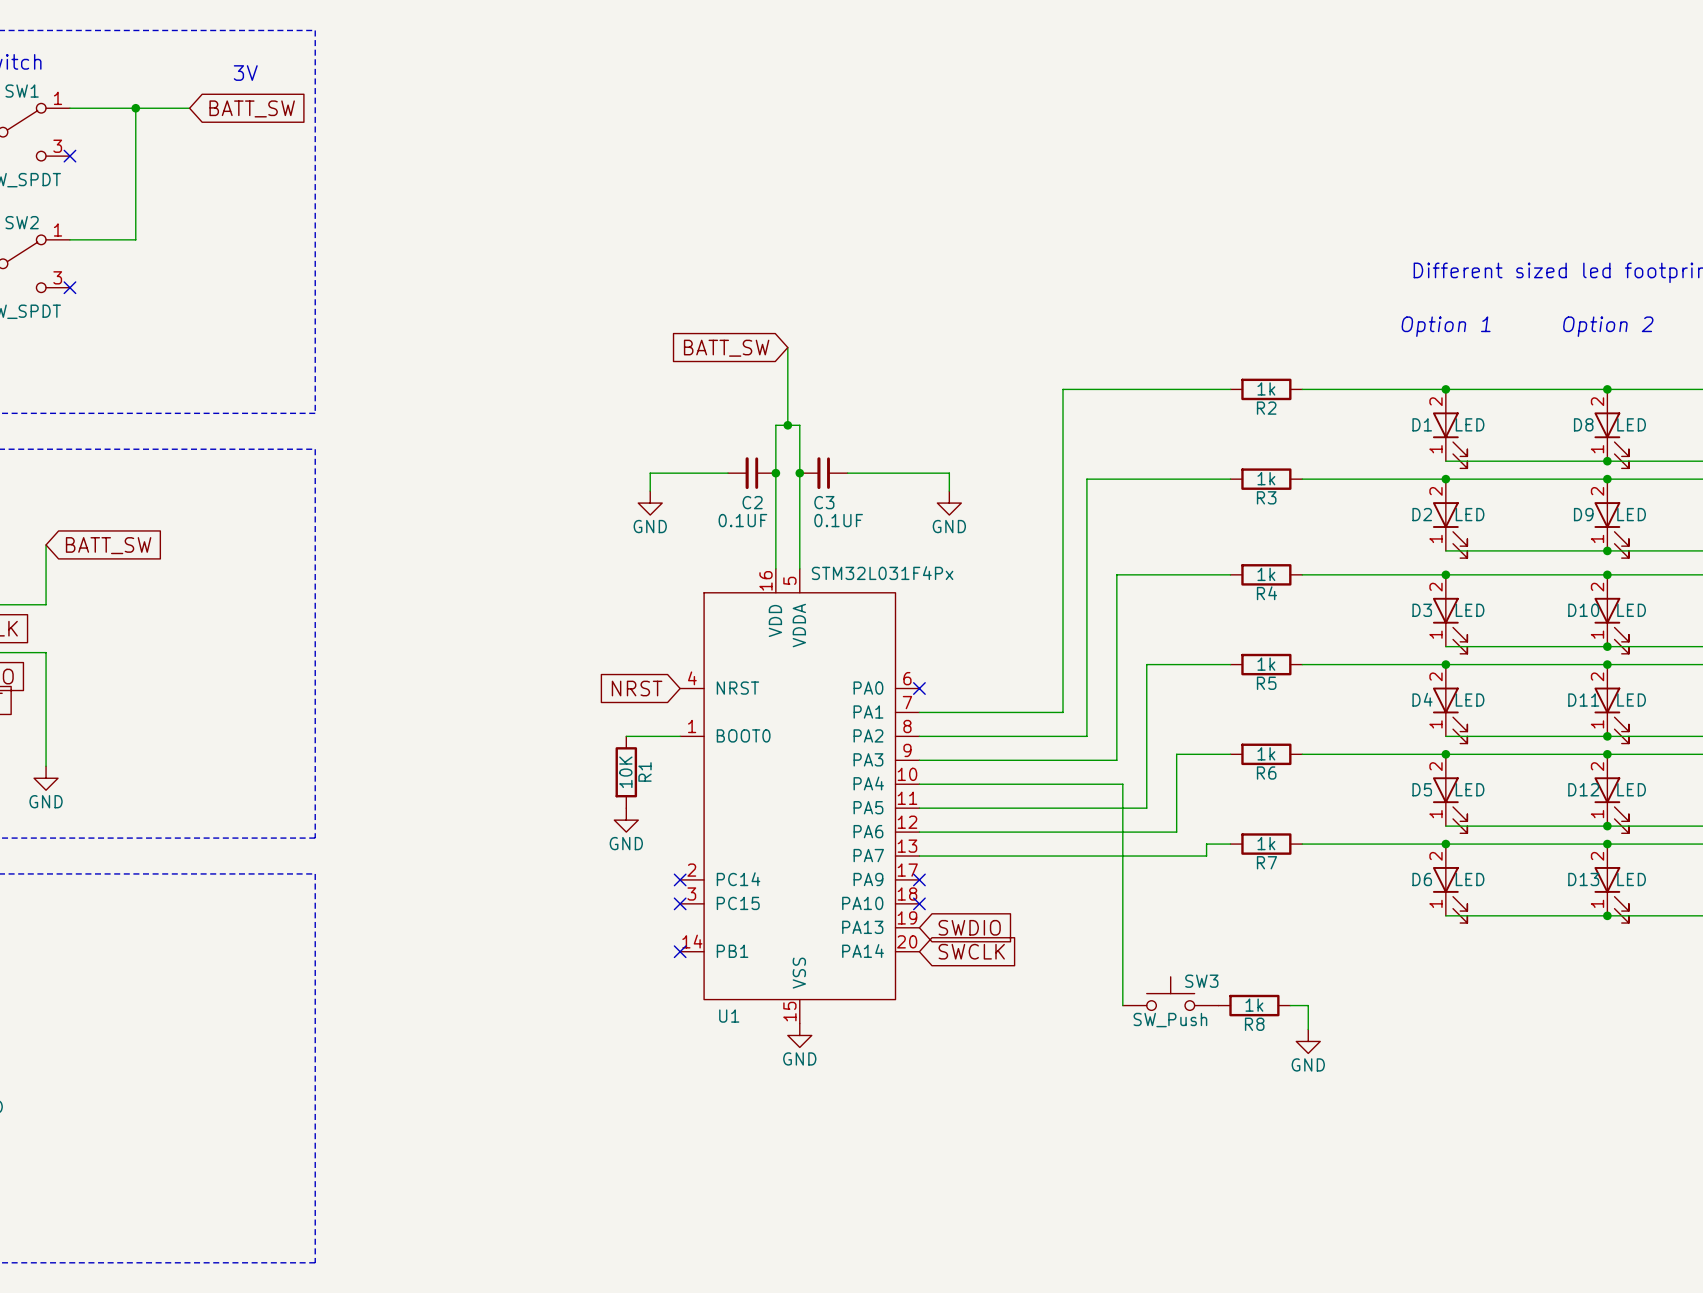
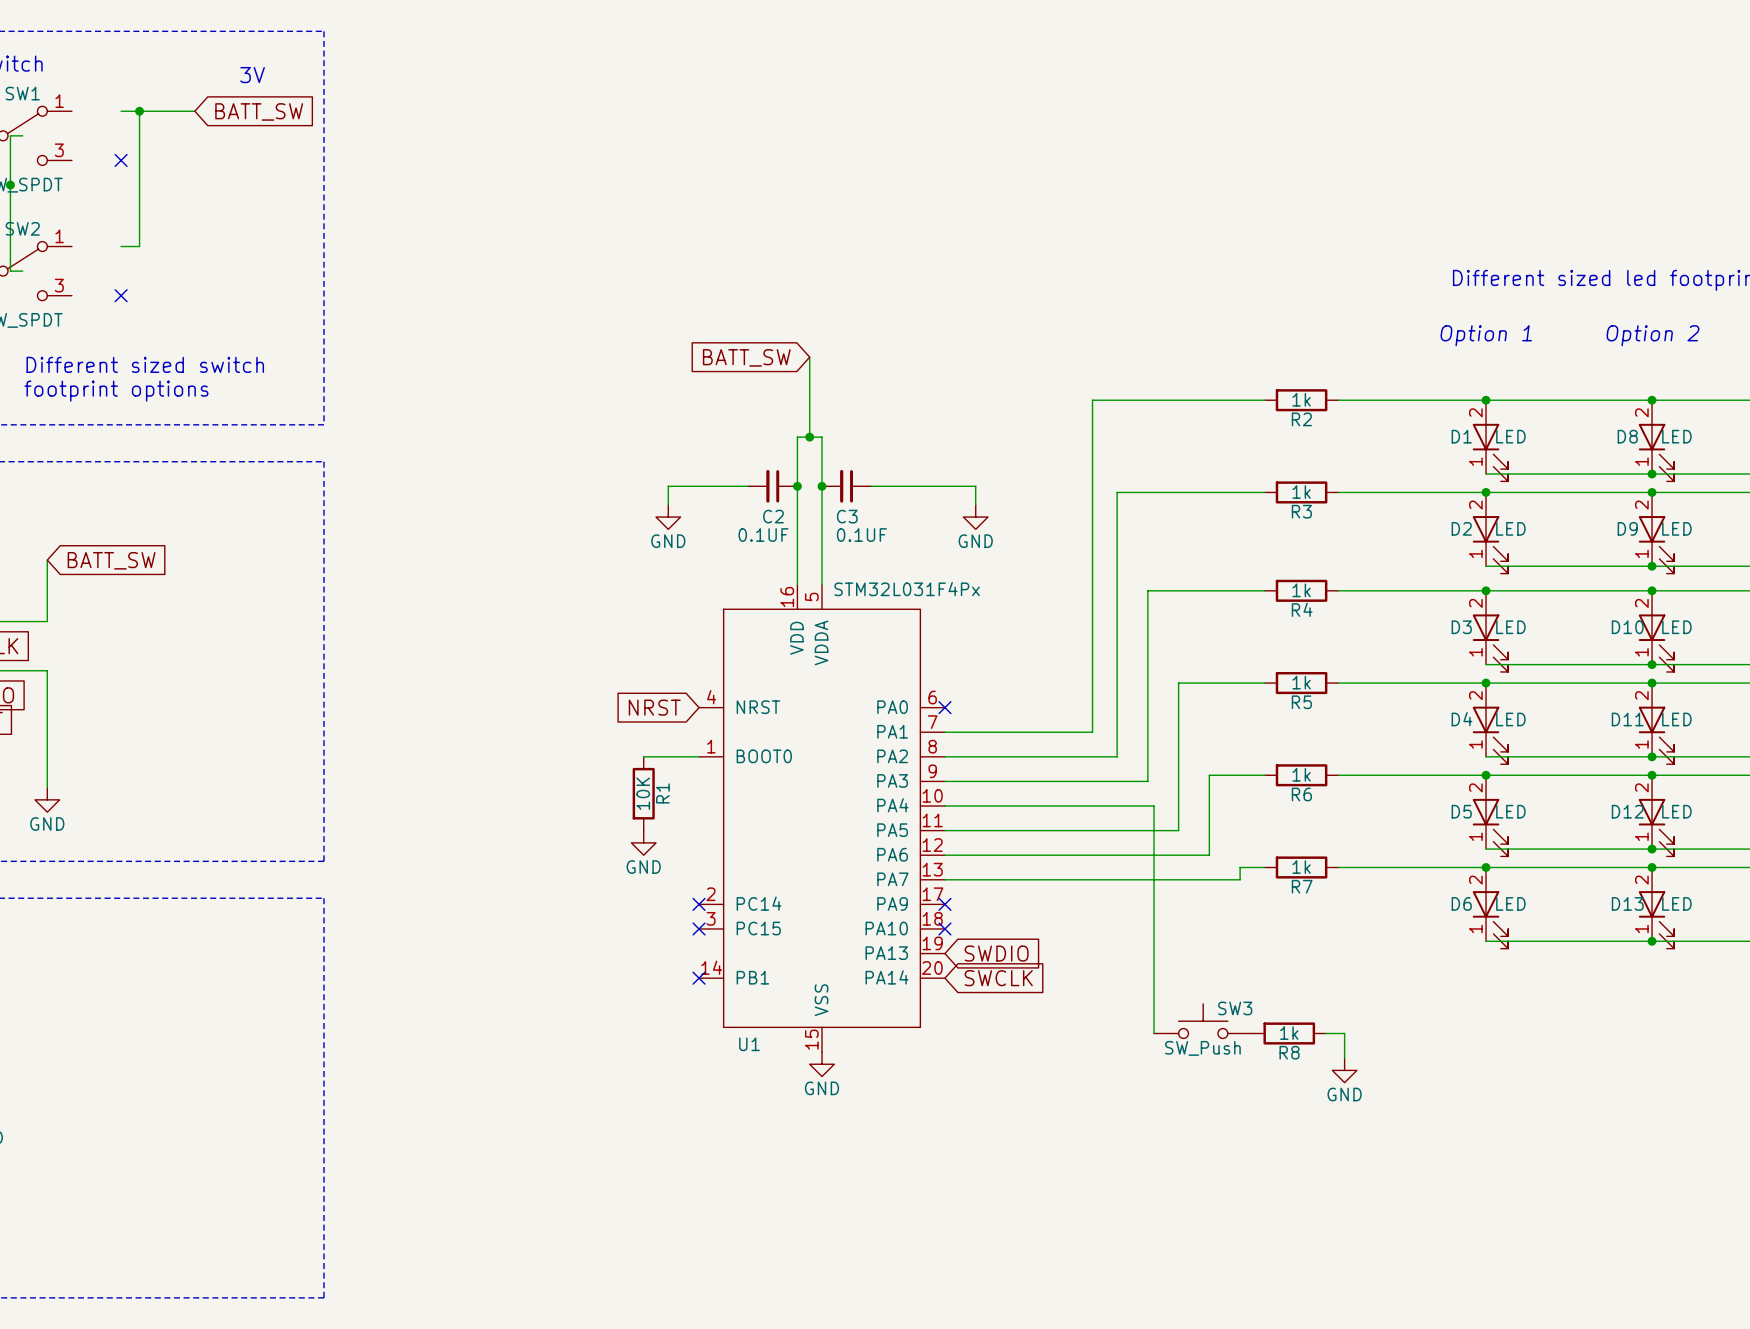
wire: (69, 108) (117, 108) -> none
wire: none -> (22, 135) (10, 135) (10, 271) (22, 271)
no-connect mark position: (69, 156) -> (121, 160)
junction: none -> (10, 185)
wire: (69, 239) (117, 239) -> none
no-connect mark position: (69, 287) -> (121, 295)
text: none -> Different sized switch (145, 364)
text: none -> footprint options (116, 391)

